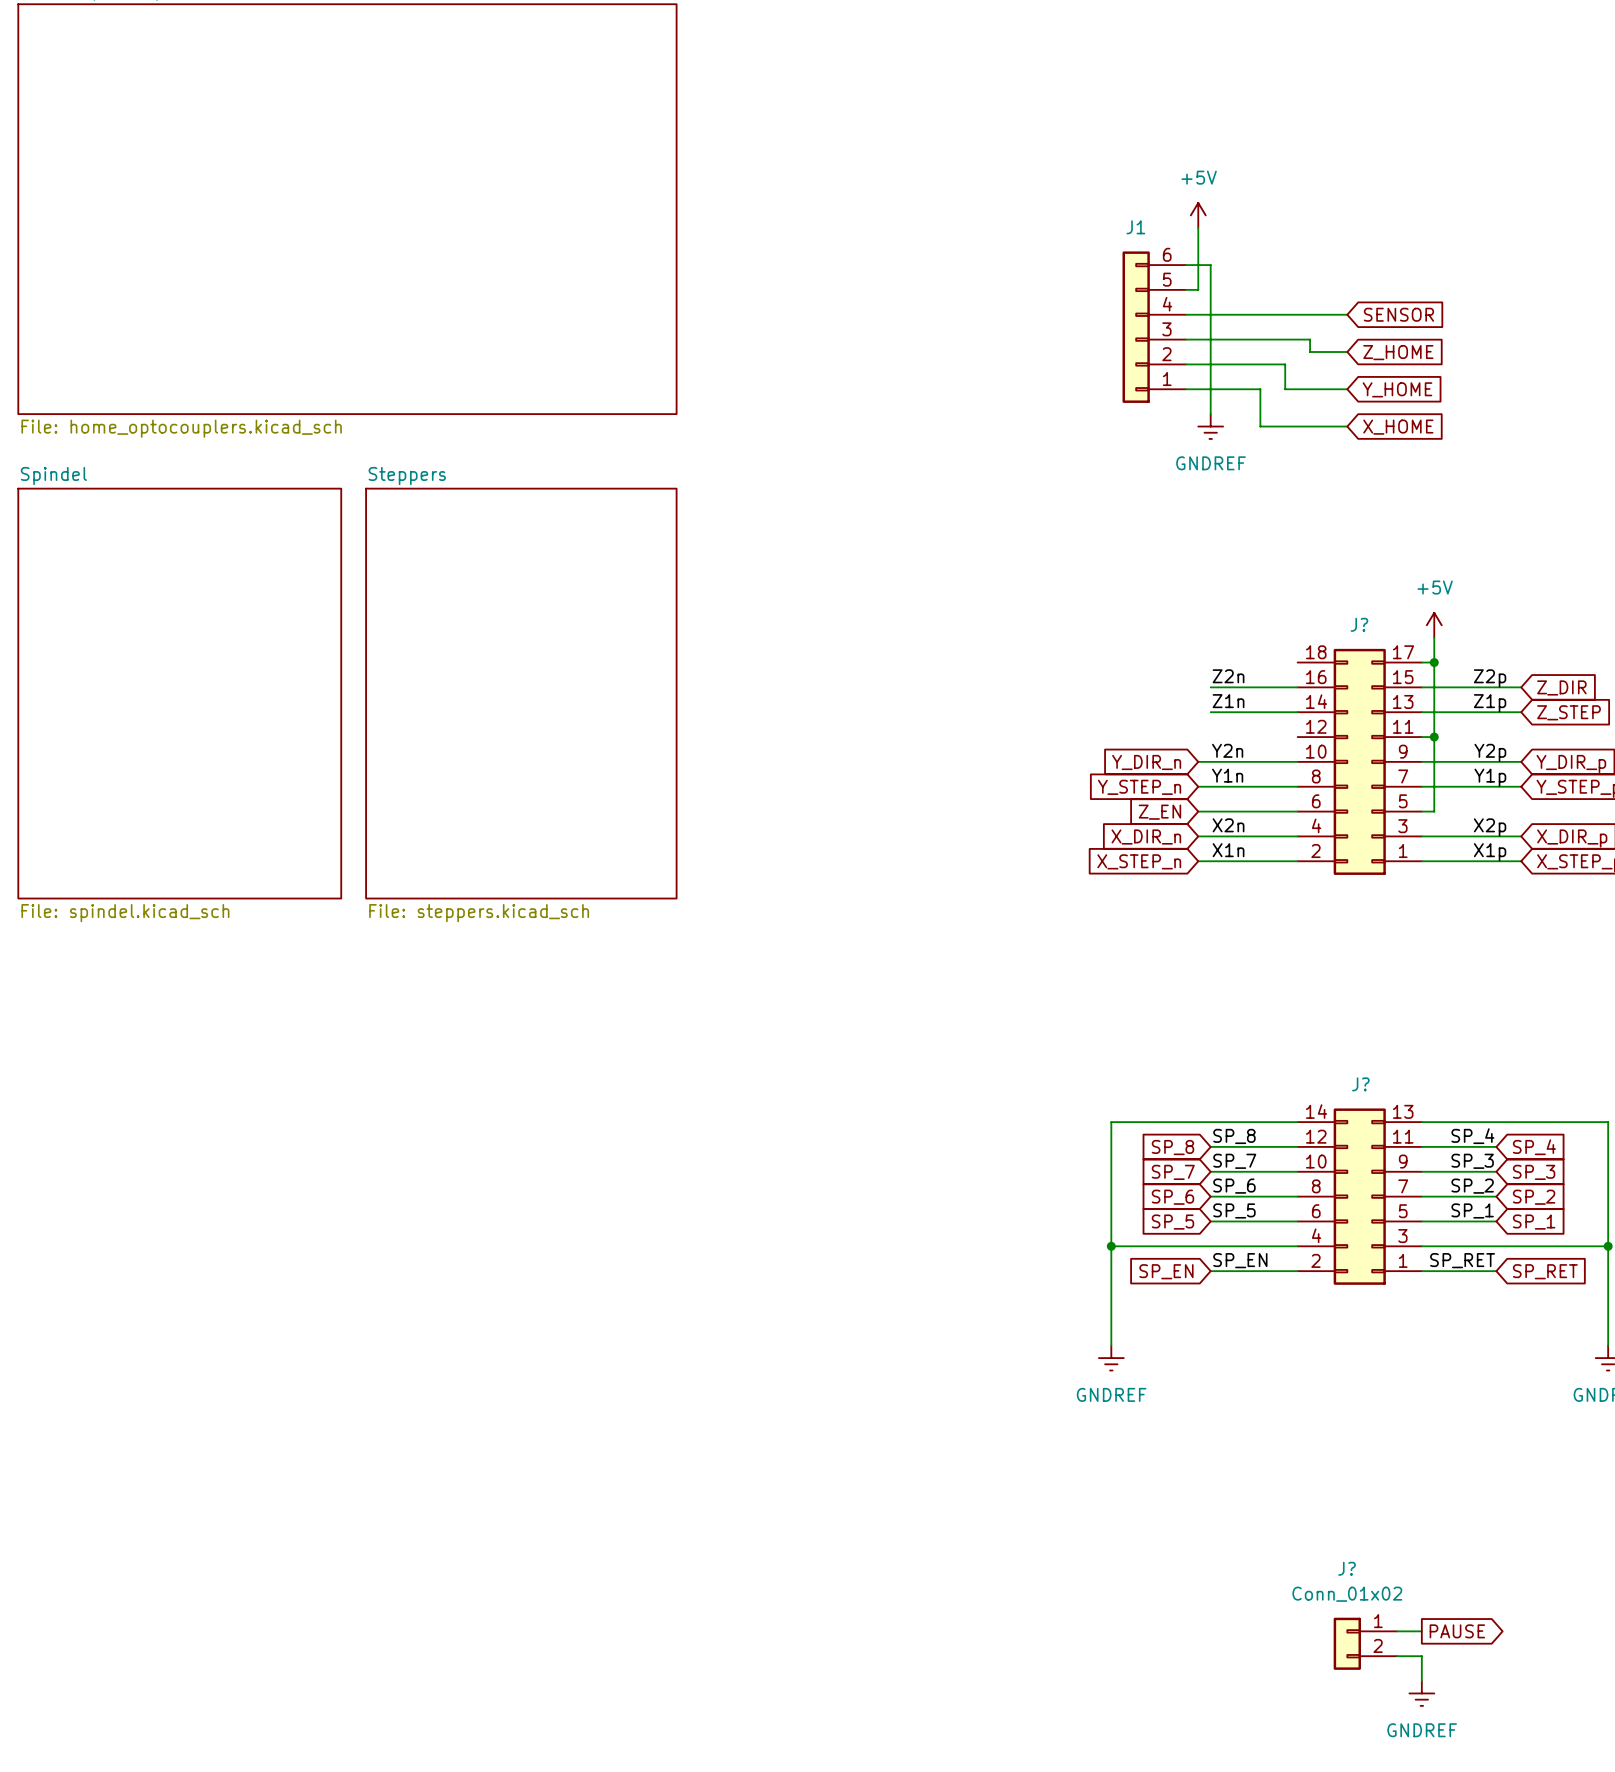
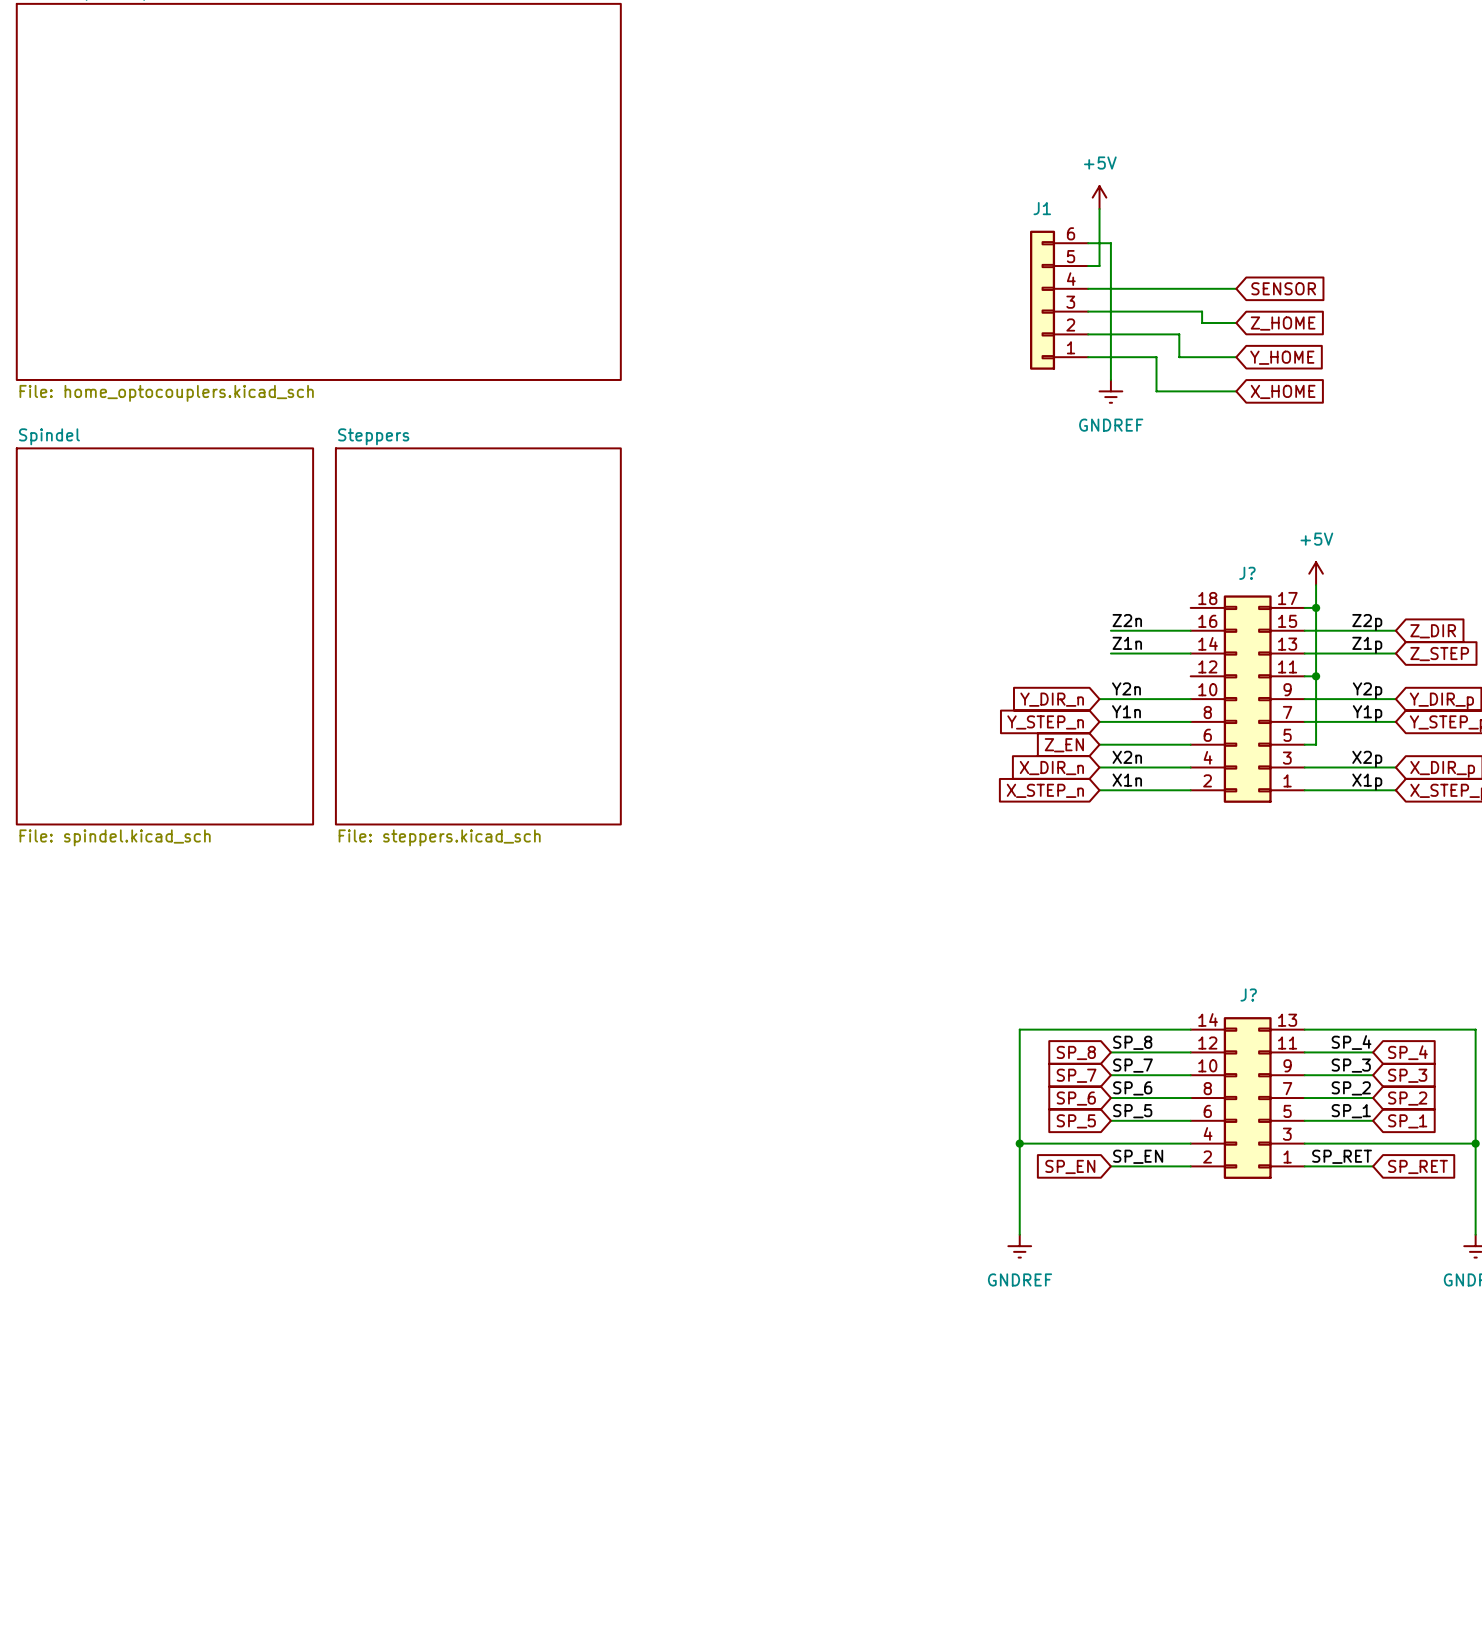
wire: (1397, 1631) (1421, 1631) -> none
global label: PAUSE (1457, 1631) -> none
J?: Conn_01x02 (1365, 1643) -> none
wire: (1397, 1656) (1421, 1656) (1421, 1681) -> none
power symbol: GNDREF (1421, 1693) -> none

